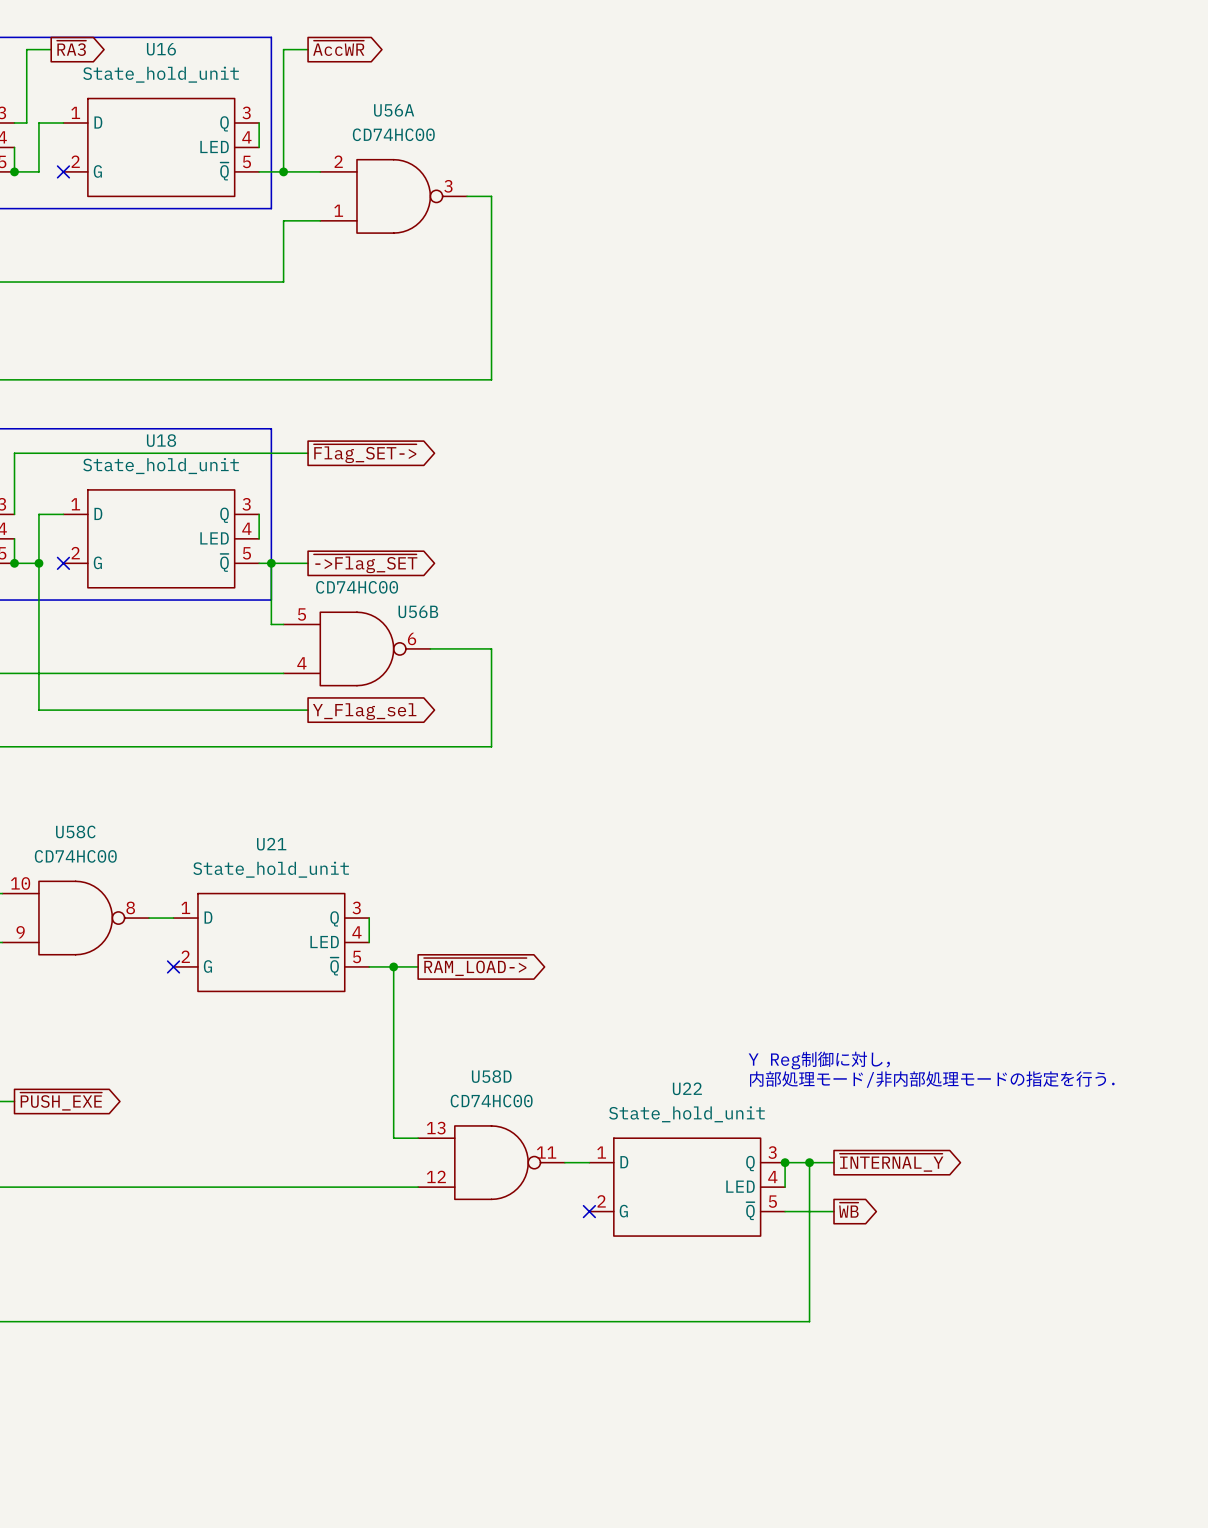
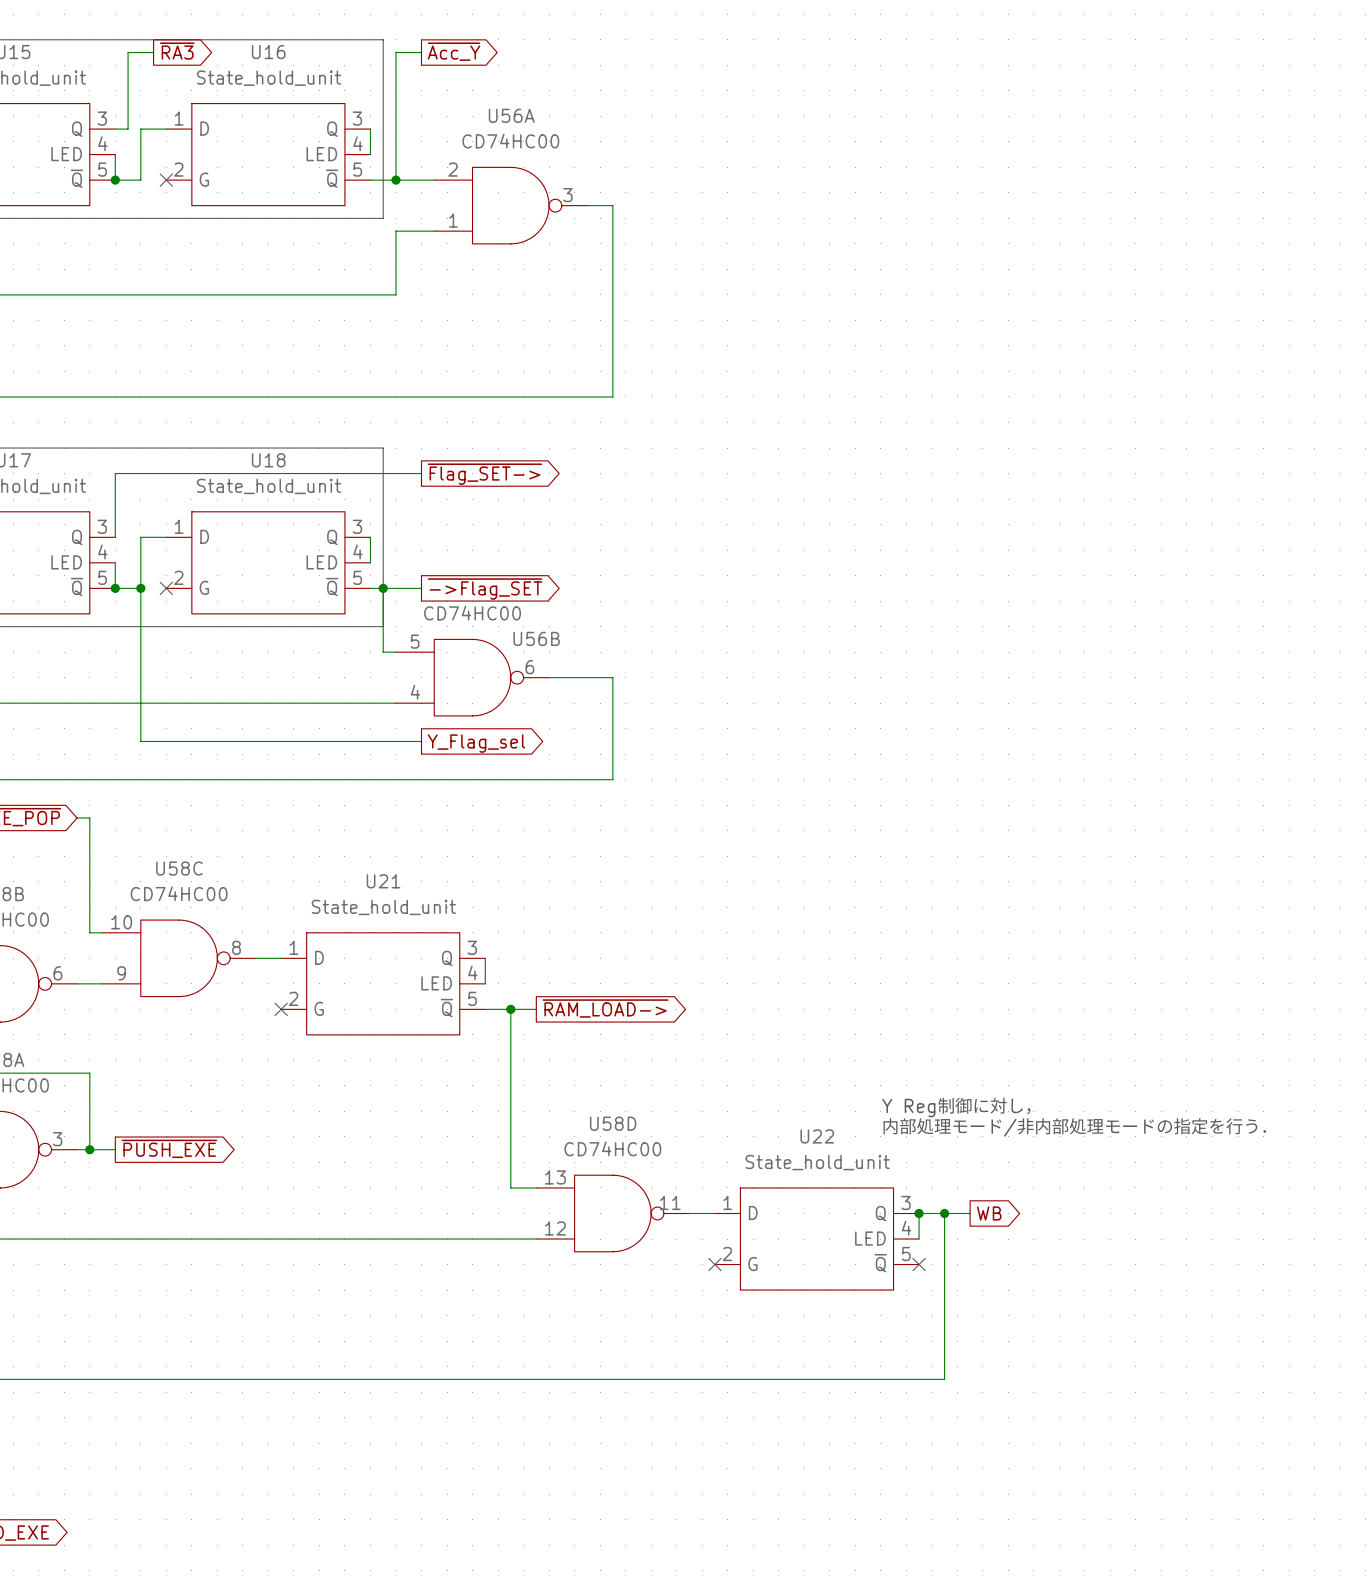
global label: ~{AccWR} (338, 48) -> ~{Acc_Y} (454, 51)
global label: ~{INTERNAL_Y} (891, 1162) -> WB (989, 1213)
global label: ~{WB} (848, 1210) -> none
wire: (785, 1211) (834, 1211) -> none
no-connect mark: none -> (919, 1264)

